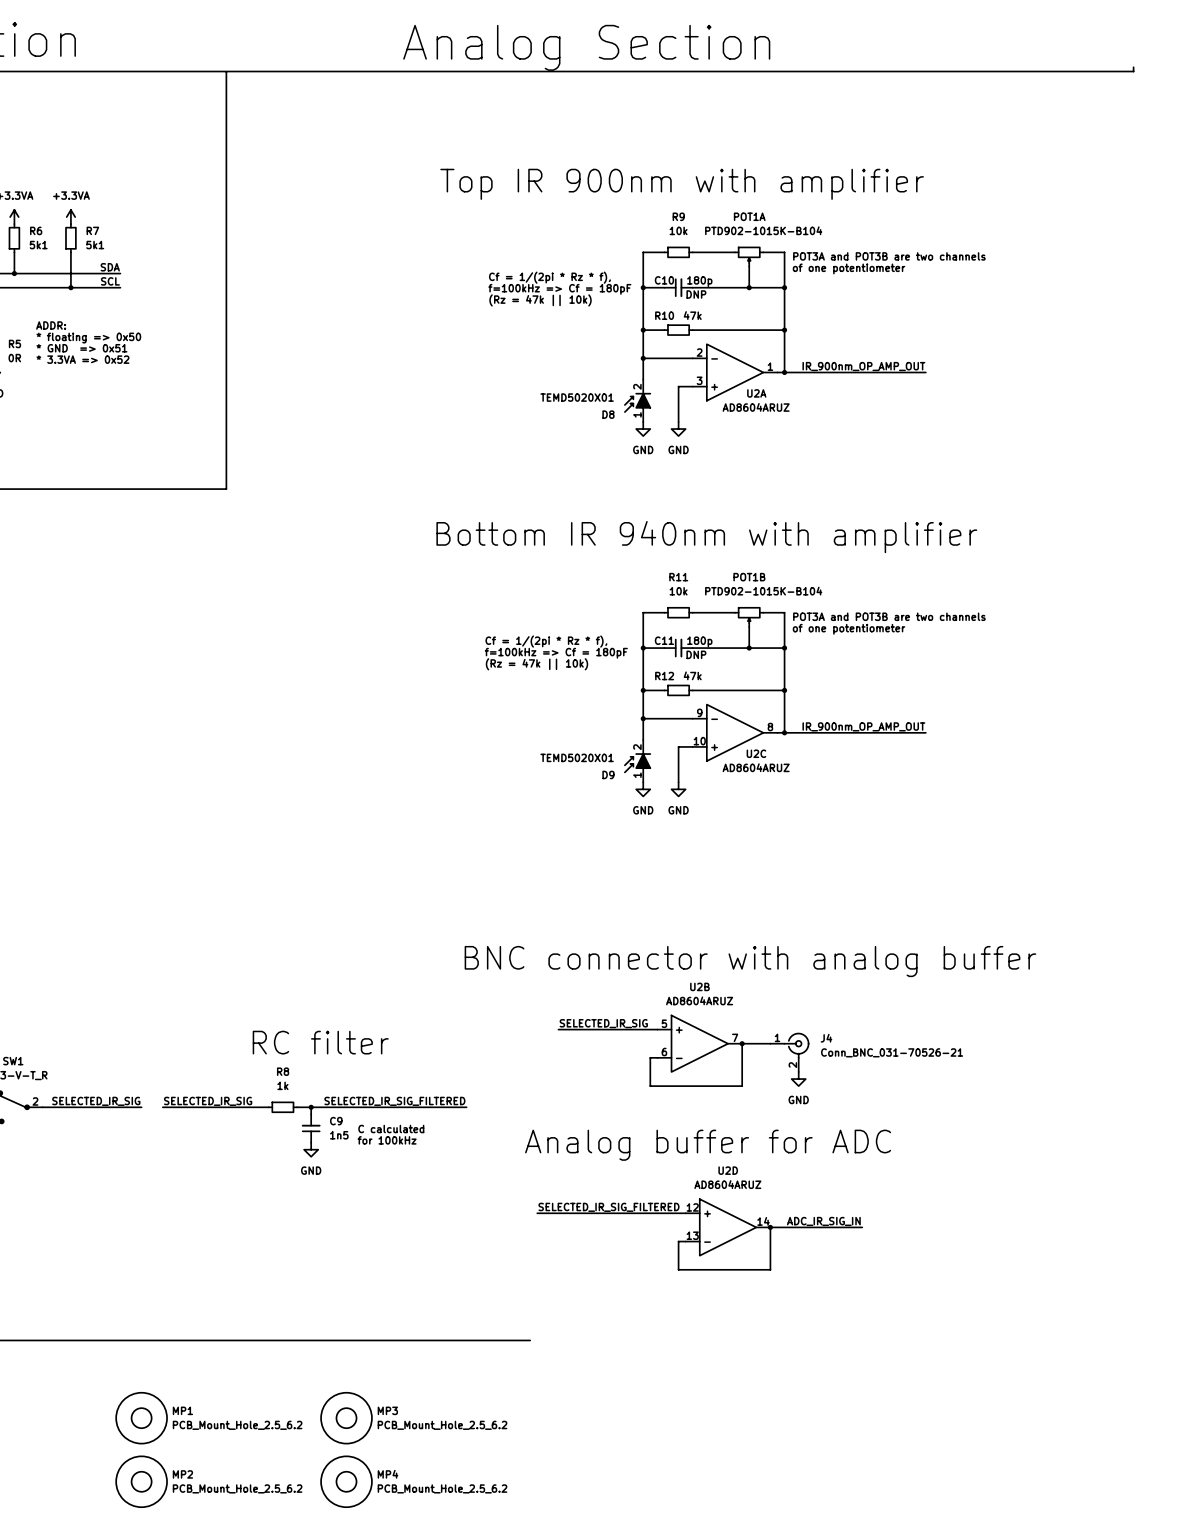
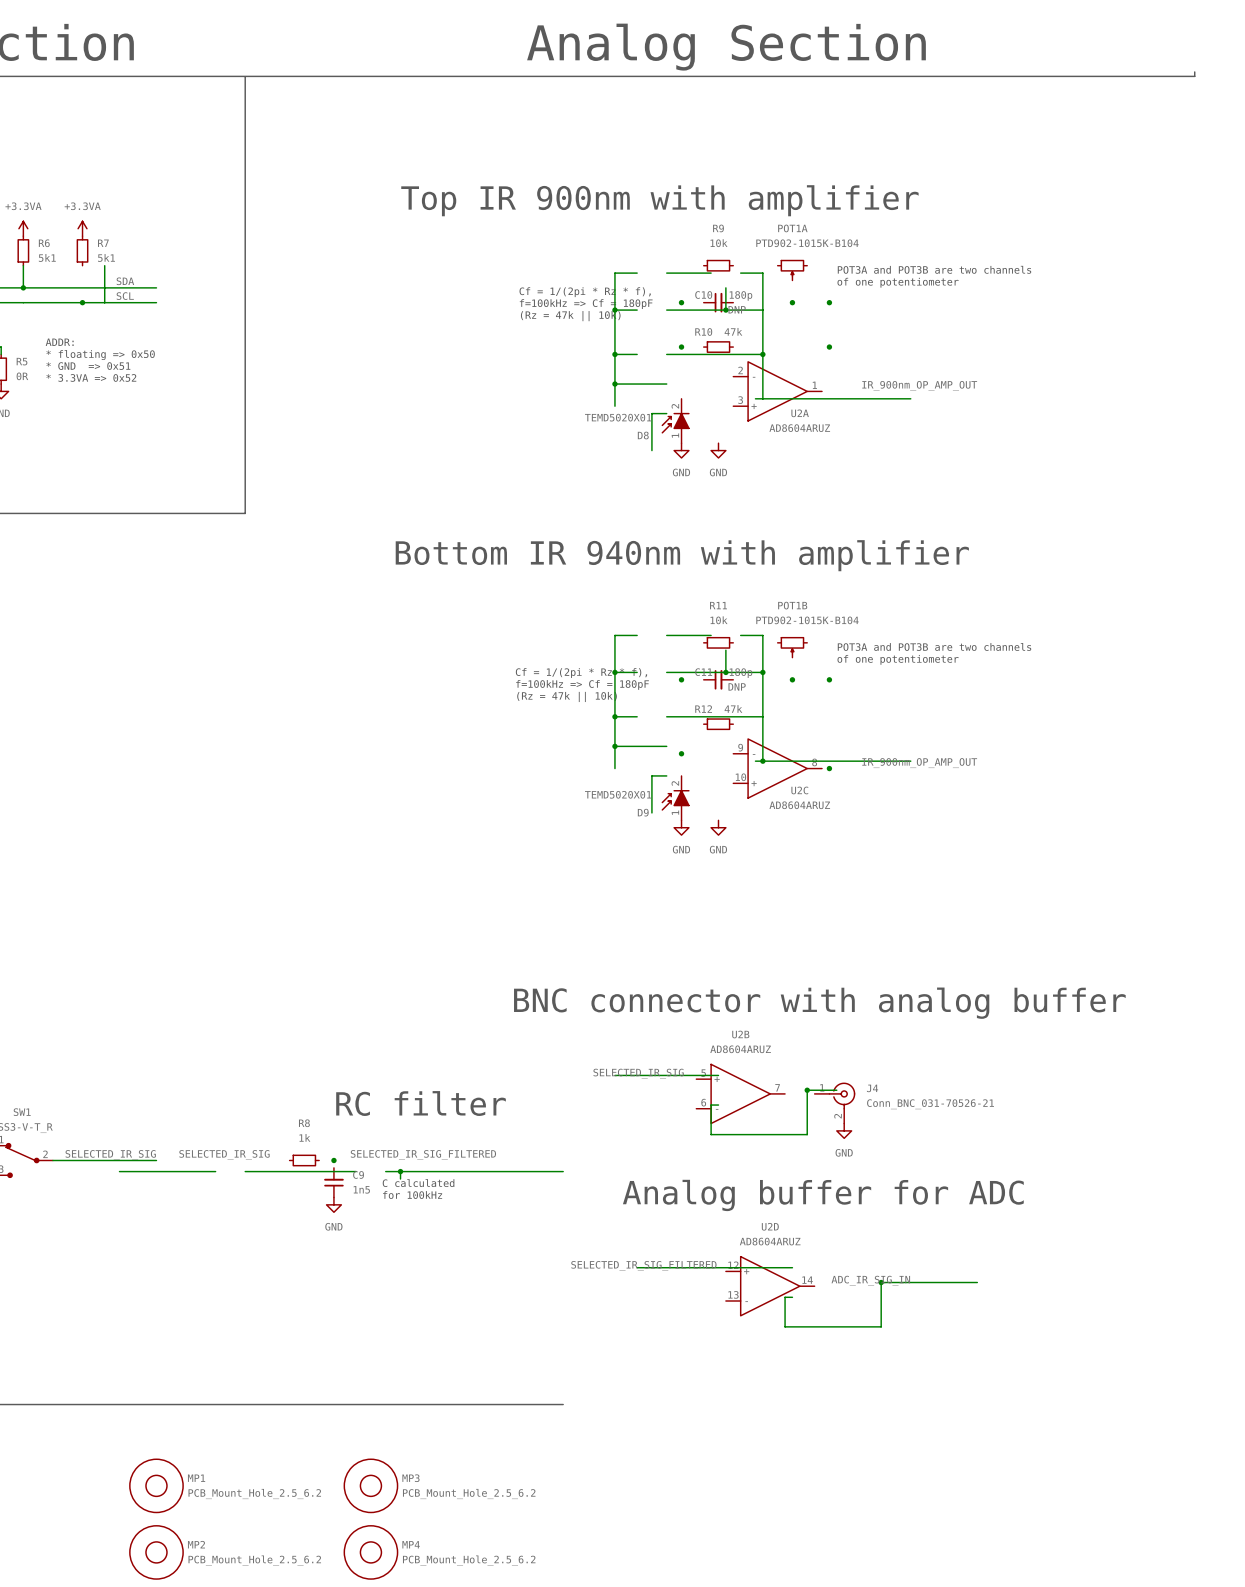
text position: Analog Section (586, 47) -> Analog Section (726, 47)
text position: Top IR 900nm with amplifier (682, 184) -> Top IR 900nm with amplifier (659, 200)
wire: (70, 252) (70, 287) -> (104, 265) (104, 302)
wire: (664, 252) (643, 252) (643, 379) -> (637, 273) (614, 273) (614, 406)
wire: (692, 252) (735, 252) -> (666, 273) (711, 273)
wire: (763, 252) (784, 252) (784, 372) -> (740, 273) (762, 273) (762, 398)
wire: (749, 266) (749, 287) -> (725, 287) (725, 310)
wire: none -> (134, 287) (156, 287)
wire: none -> (134, 302) (156, 302)
wire: (643, 287) (664, 287) -> (614, 310) (637, 310)
wire: (692, 287) (784, 287) -> (666, 310) (762, 310)
junction: none -> (614, 310)
junction: none -> (725, 310)
wire: (643, 330) (664, 330) -> (614, 354) (637, 354)
wire: (692, 330) (784, 330) -> (666, 354) (762, 354)
junction: none -> (614, 354)
junction: none -> (762, 354)
wire: (643, 358) (692, 358) -> (614, 384) (666, 384)
junction: (643, 358) -> none
junction: none -> (614, 384)
wire: (777, 372) (925, 372) -> (755, 398) (910, 398)
junction: (784, 372) -> none
wire: (692, 386) (678, 386) (678, 421) -> (666, 413) (651, 413) (651, 450)
text position: Bottom IR 940nm with amplifier (706, 537) -> Bottom IR 940nm with amplifier (682, 555)
wire: (664, 612) (643, 612) (643, 739) -> (637, 635) (614, 635) (614, 768)
wire: (692, 612) (735, 612) -> (666, 635) (711, 635)
wire: (763, 612) (784, 612) (784, 732) -> (740, 635) (762, 635) (762, 761)
wire: (749, 626) (749, 648) -> (725, 650) (725, 672)
junction: none -> (614, 672)
junction: none -> (725, 672)
junction: none -> (762, 672)
wire: (643, 648) (664, 648) -> (614, 672) (637, 672)
wire: (692, 648) (784, 648) -> (666, 672) (762, 672)
junction: none -> (614, 716)
wire: (643, 690) (664, 690) -> (614, 716) (637, 716)
junction: (643, 690) -> none
wire: (692, 690) (784, 690) -> (666, 716) (762, 716)
junction: (784, 690) -> none
junction: none -> (614, 746)
wire: (643, 718) (692, 718) -> (614, 746) (666, 746)
junction: none -> (762, 761)
wire: (777, 732) (925, 732) -> (755, 761) (910, 761)
wire: (692, 746) (678, 746) (678, 782) -> (666, 775) (651, 775) (651, 812)
text position: BNC connector with analog buffer (750, 961) -> BNC connector with analog buffer (819, 1003)
wire: (558, 1029) (657, 1029) -> (614, 1075) (718, 1075)
text position: RC filter (320, 1042) -> RC filter (421, 1103)
junction position: (742, 1043) -> (807, 1090)
wire: (770, 1043) (742, 1043) (742, 1086) (650, 1086) (650, 1057) (657, 1057) -> (836, 1090) (807, 1090) (807, 1134) (711, 1134) (711, 1105) (718, 1105)
wire: (162, 1107) (268, 1107) -> (245, 1171) (356, 1171)
wire: (297, 1107) (466, 1107) -> (385, 1171) (563, 1171)
wire: (311, 1107) (311, 1114) -> (400, 1171) (400, 1178)
wire: none -> (119, 1171) (215, 1171)
junction: none -> (400, 1171)
text position: Analog buffer for ADC (708, 1145) -> Analog buffer for ADC (823, 1195)
wire: (537, 1213) (685, 1213) -> (637, 1267) (792, 1267)
junction: none -> (881, 1282)
junction: (770, 1227) -> none
wire: (862, 1227) (770, 1227) (770, 1269) (678, 1269) (678, 1241) (685, 1241) -> (977, 1282) (881, 1282) (881, 1326) (785, 1326) (785, 1297) (792, 1297)

